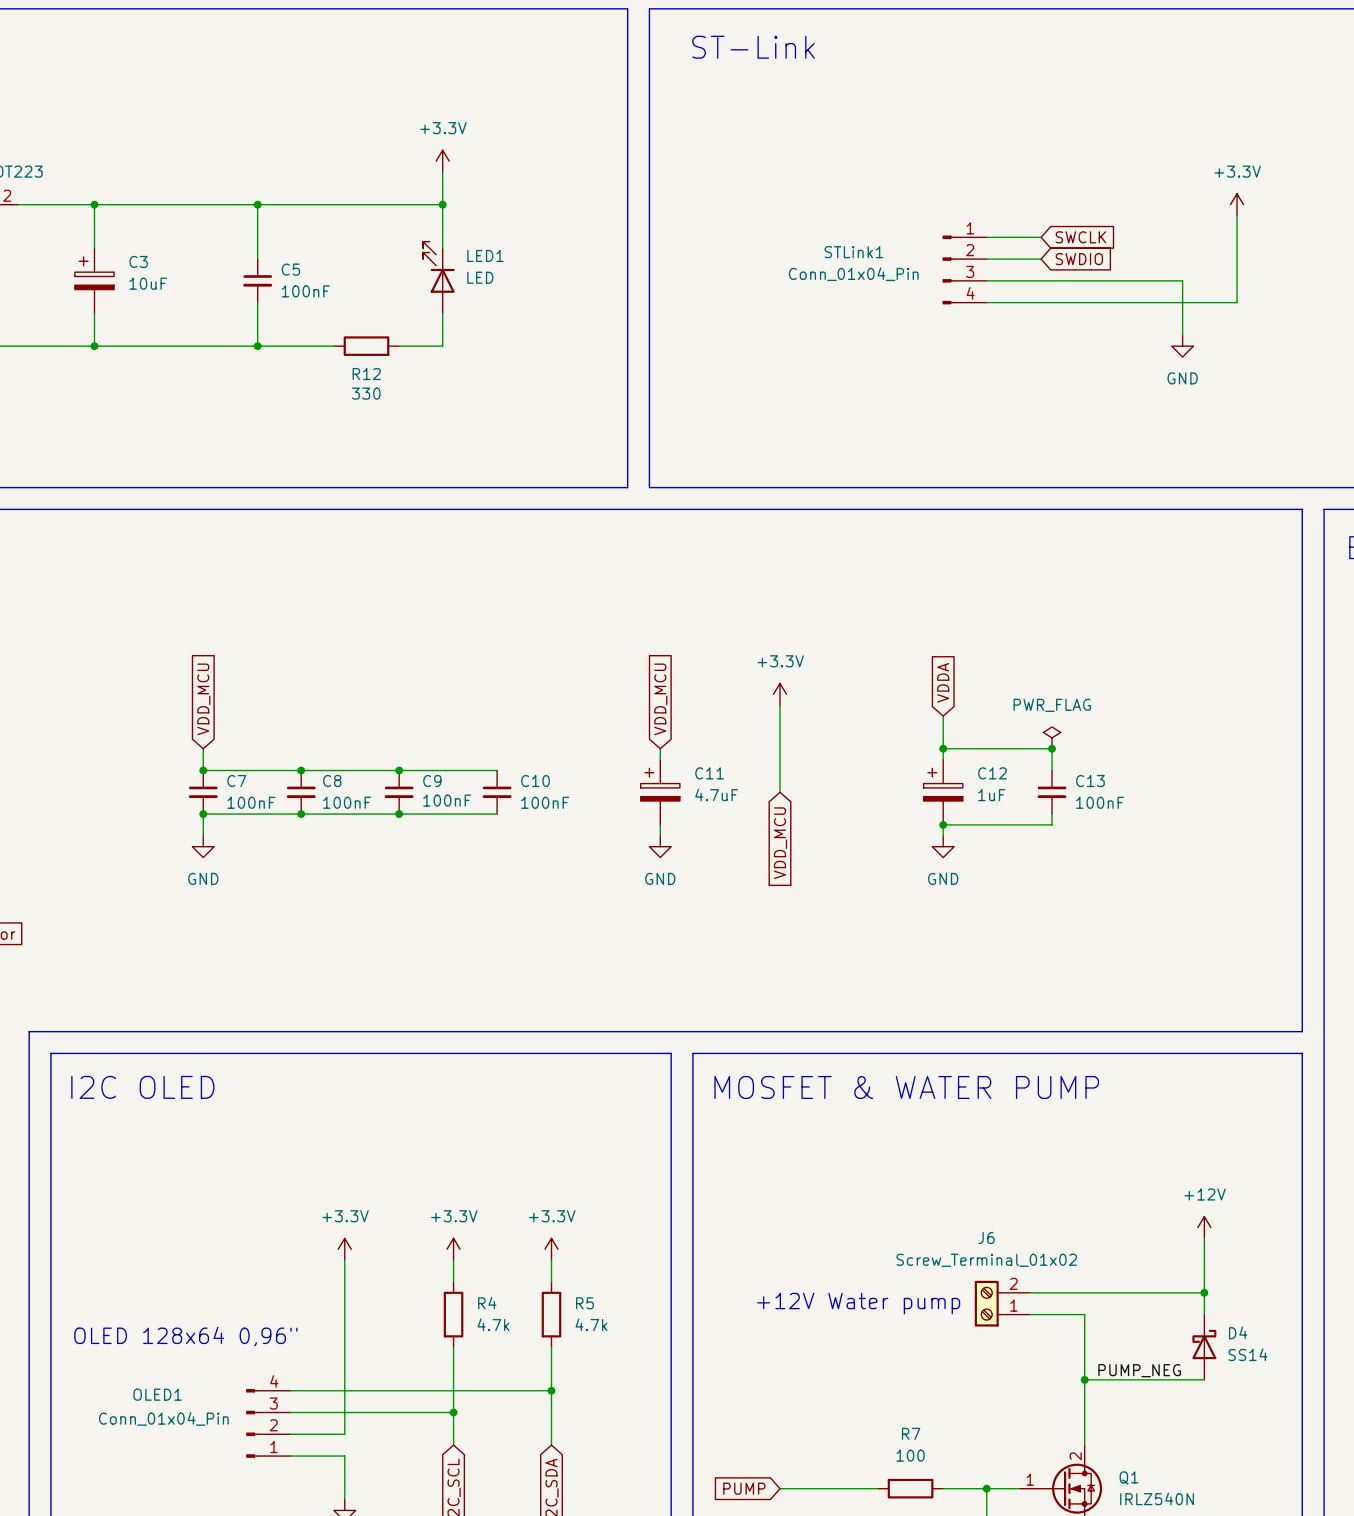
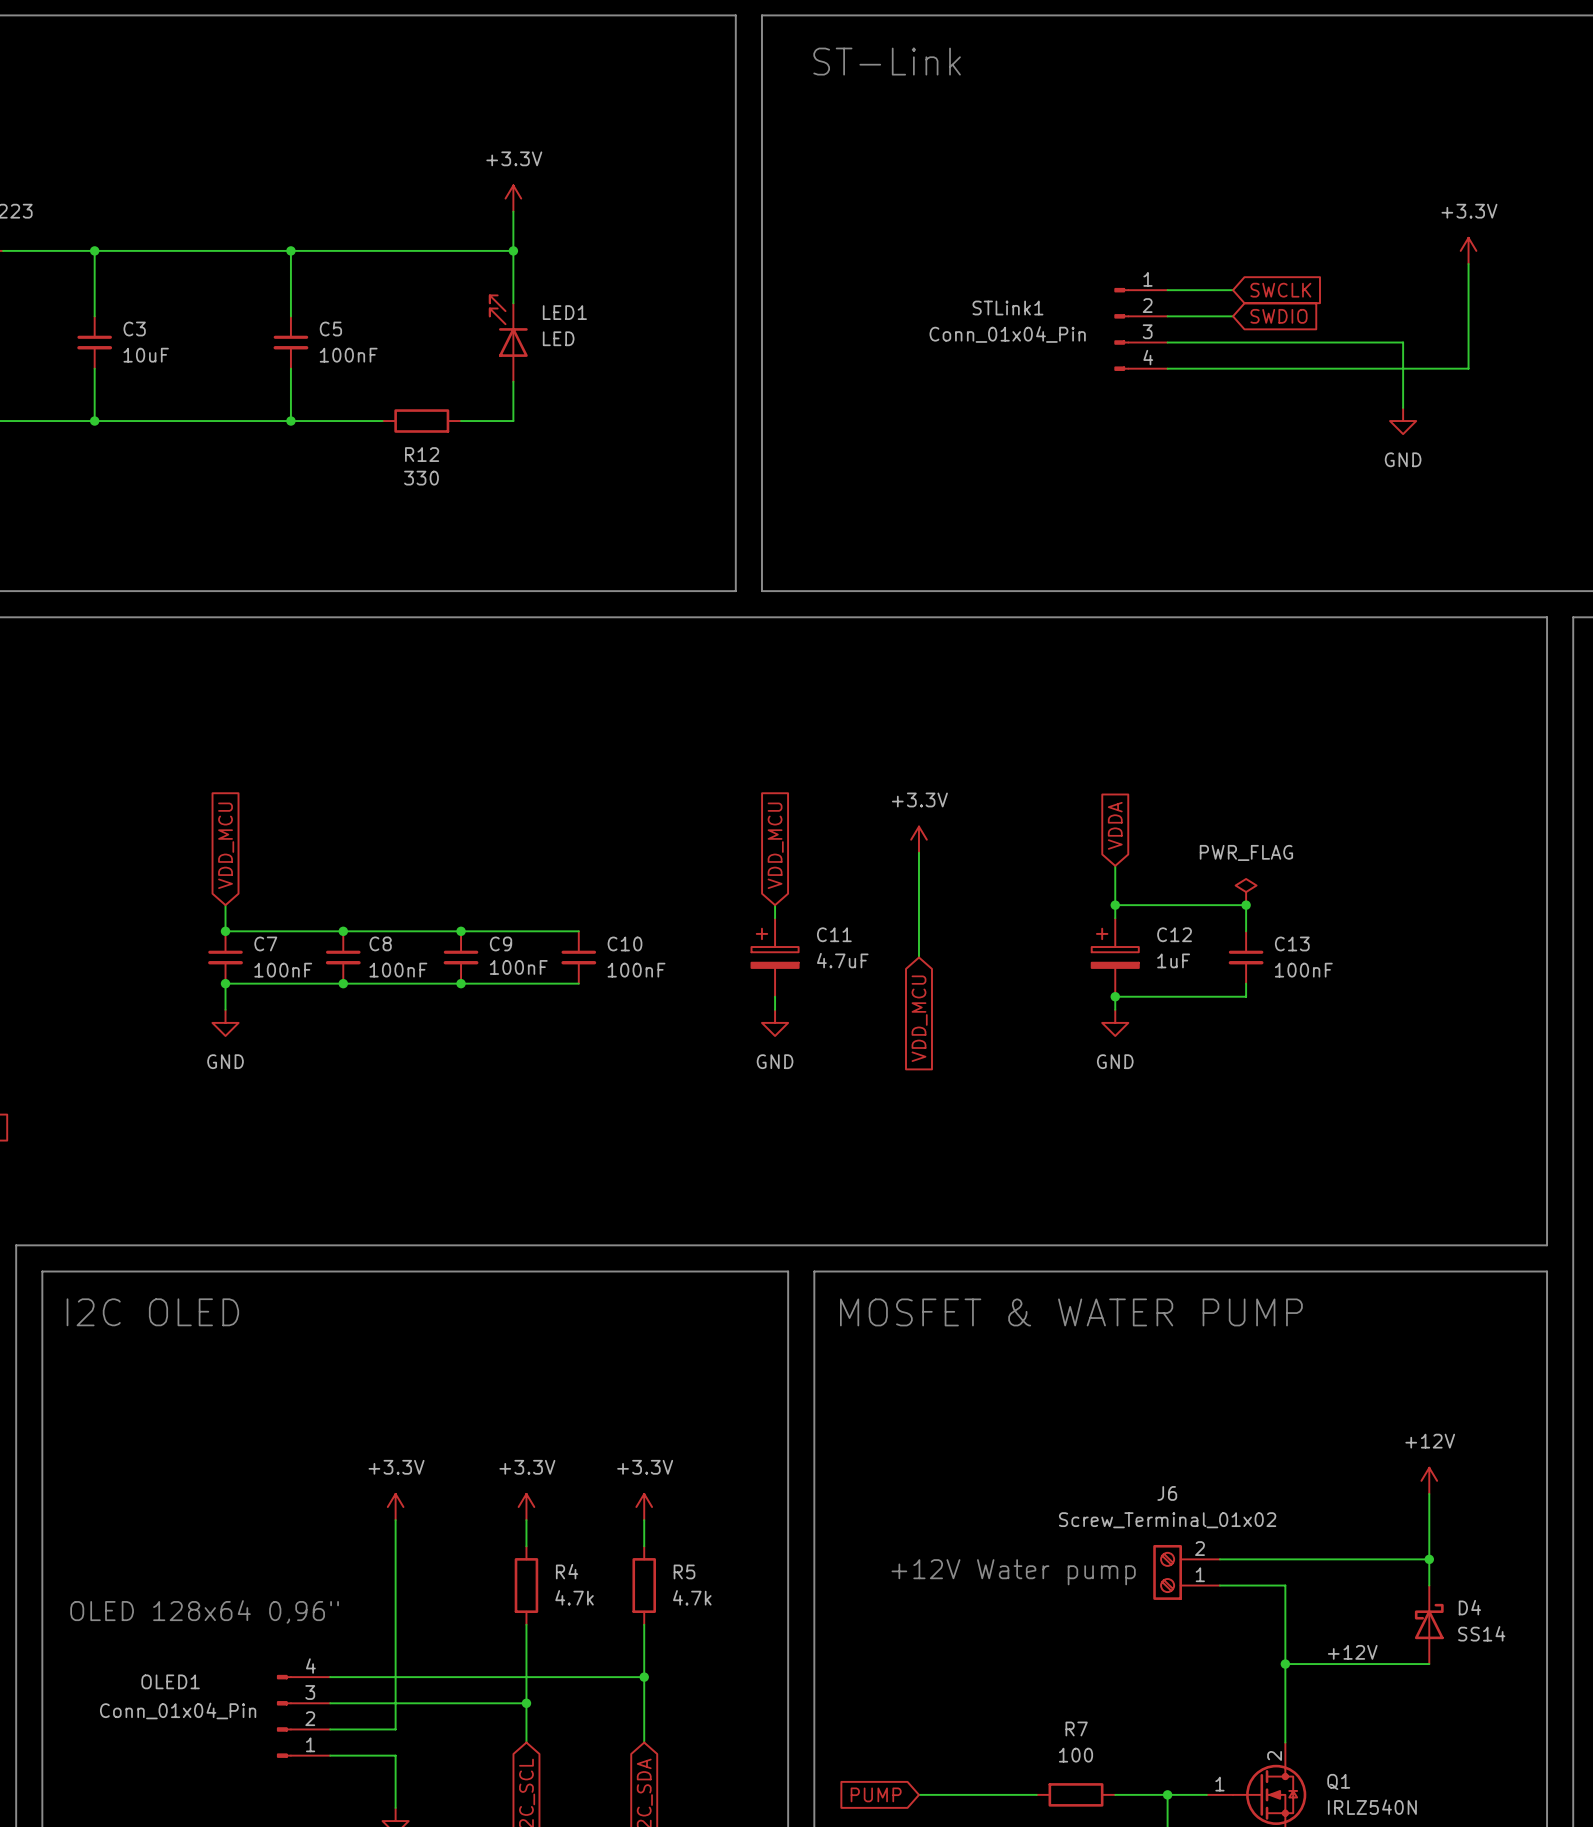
C3 symbol: [74, 248, 115, 314] -> [77, 316, 113, 369]
label: PUMP_NEG (1139, 1370) -> none
label: none -> +12V (1352, 1652)

